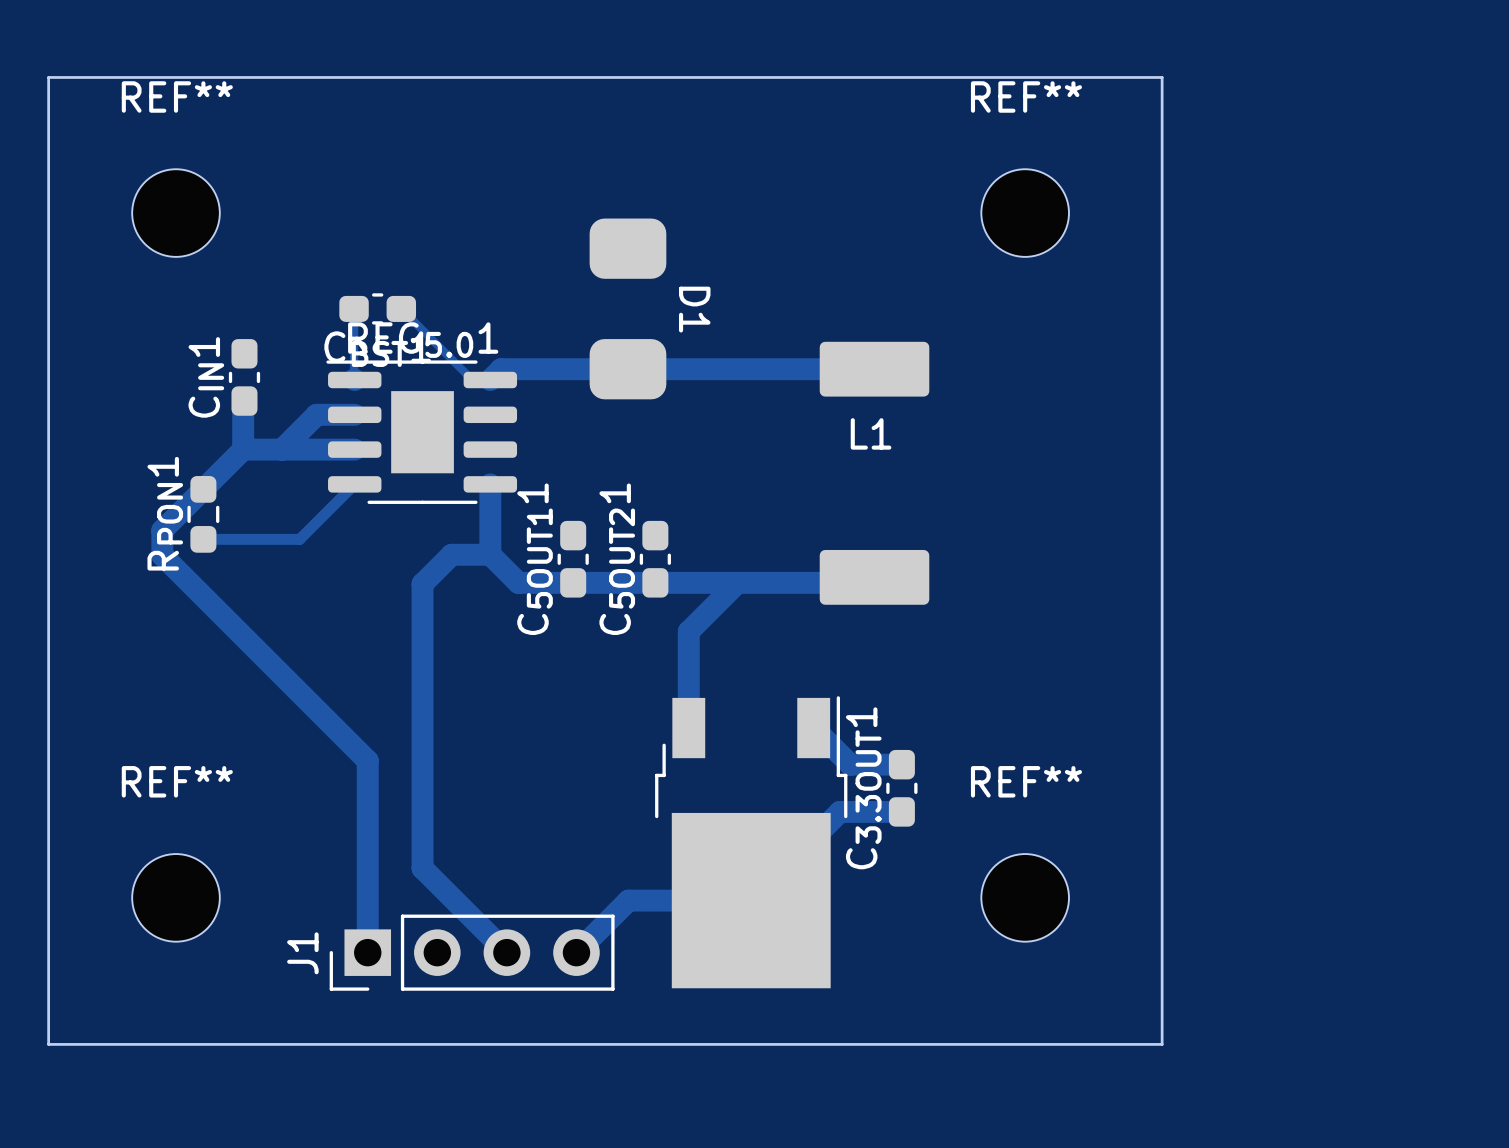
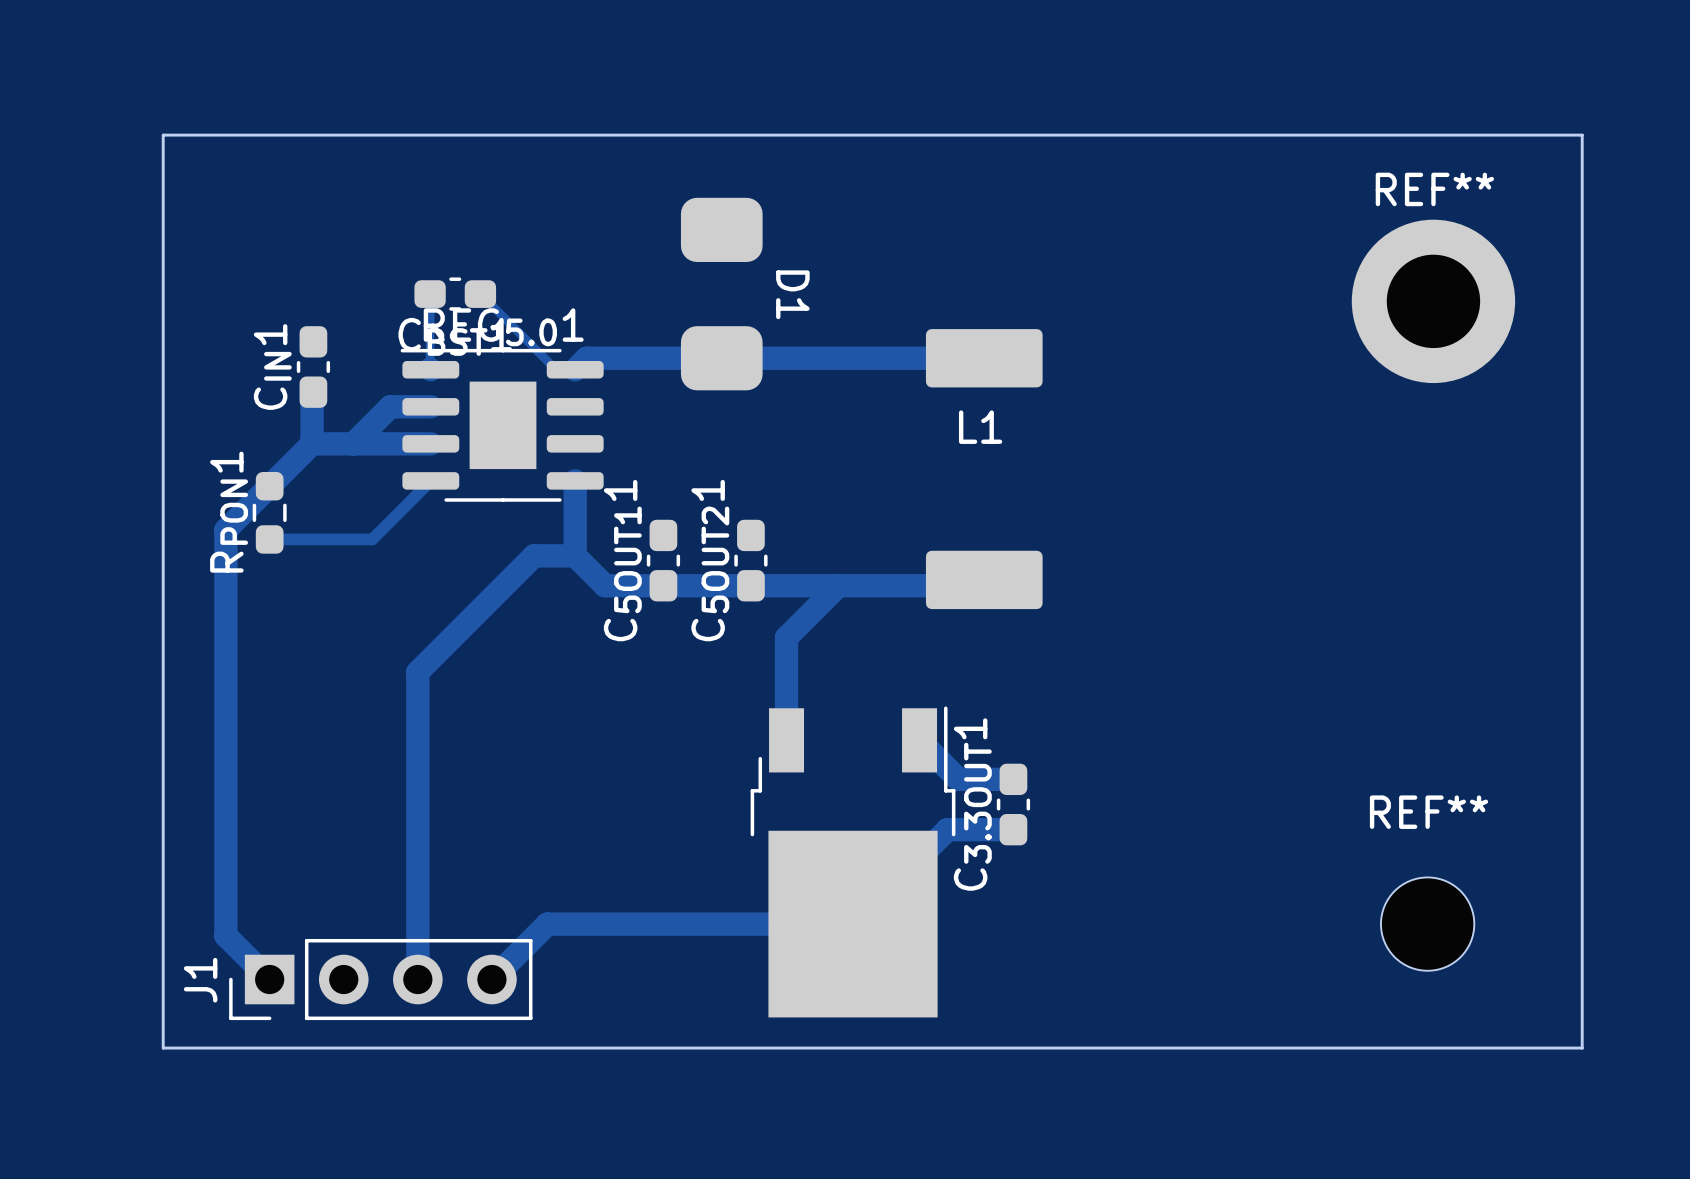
board edge: (48, 77) (1162, 77) (1162, 1044) (48, 1044) (48, 77) -> (163, 135) (163, 1048) (1582, 1048) (1582, 135) (163, 135)
REF**: (176, 213) -> none
REF**: (1025, 213) -> none
REF**: none -> (1433, 301)
track: (162, 555) (367, 760) (367, 952) -> (225, 556) (225, 935) (269, 979)
track: (422, 583) (422, 868) (506, 952) -> (503, 586) (417, 672) (417, 979)
REF** name position: REF** (1026, 781) -> REF** (1429, 812)
REF**: (176, 897) -> none
REF** position: (1025, 897) -> (1427, 924)
track: (628, 900) (576, 952) -> (722, 924) (547, 924) (491, 979)
J1 position: (472, 952) -> (380, 979)

